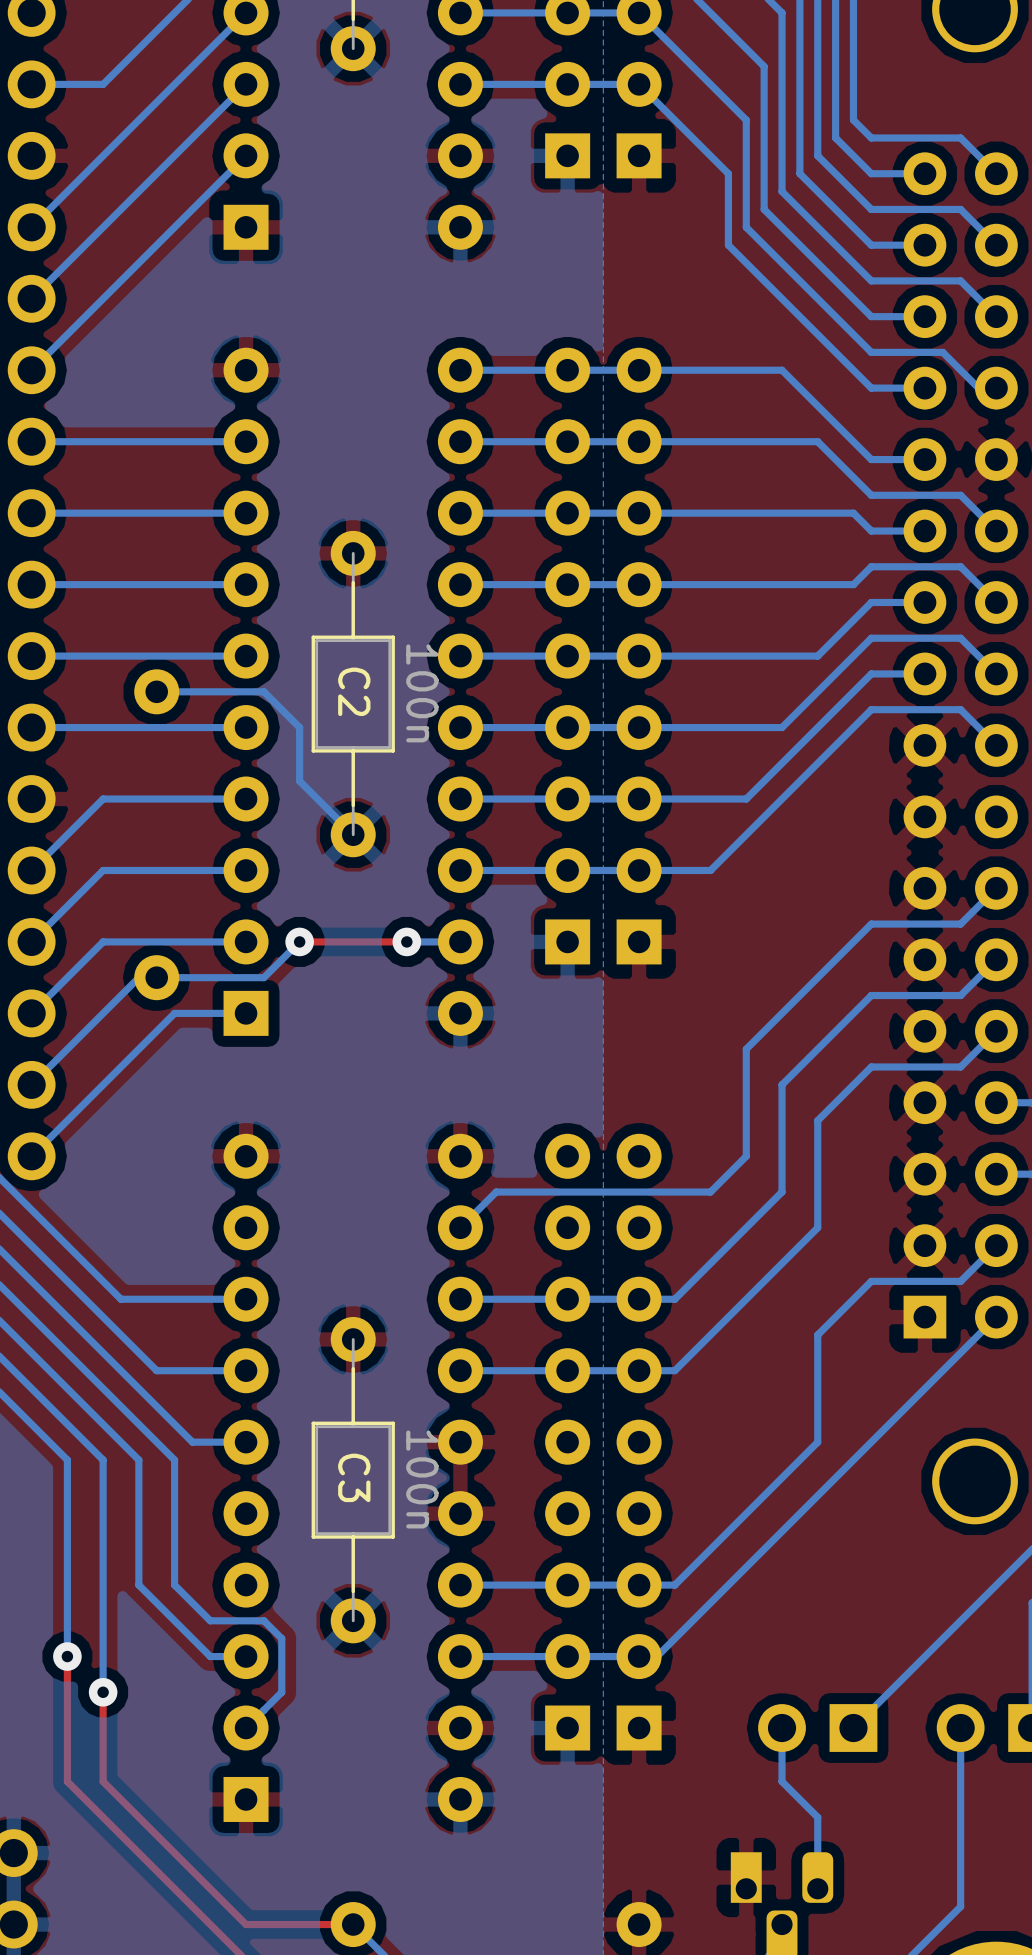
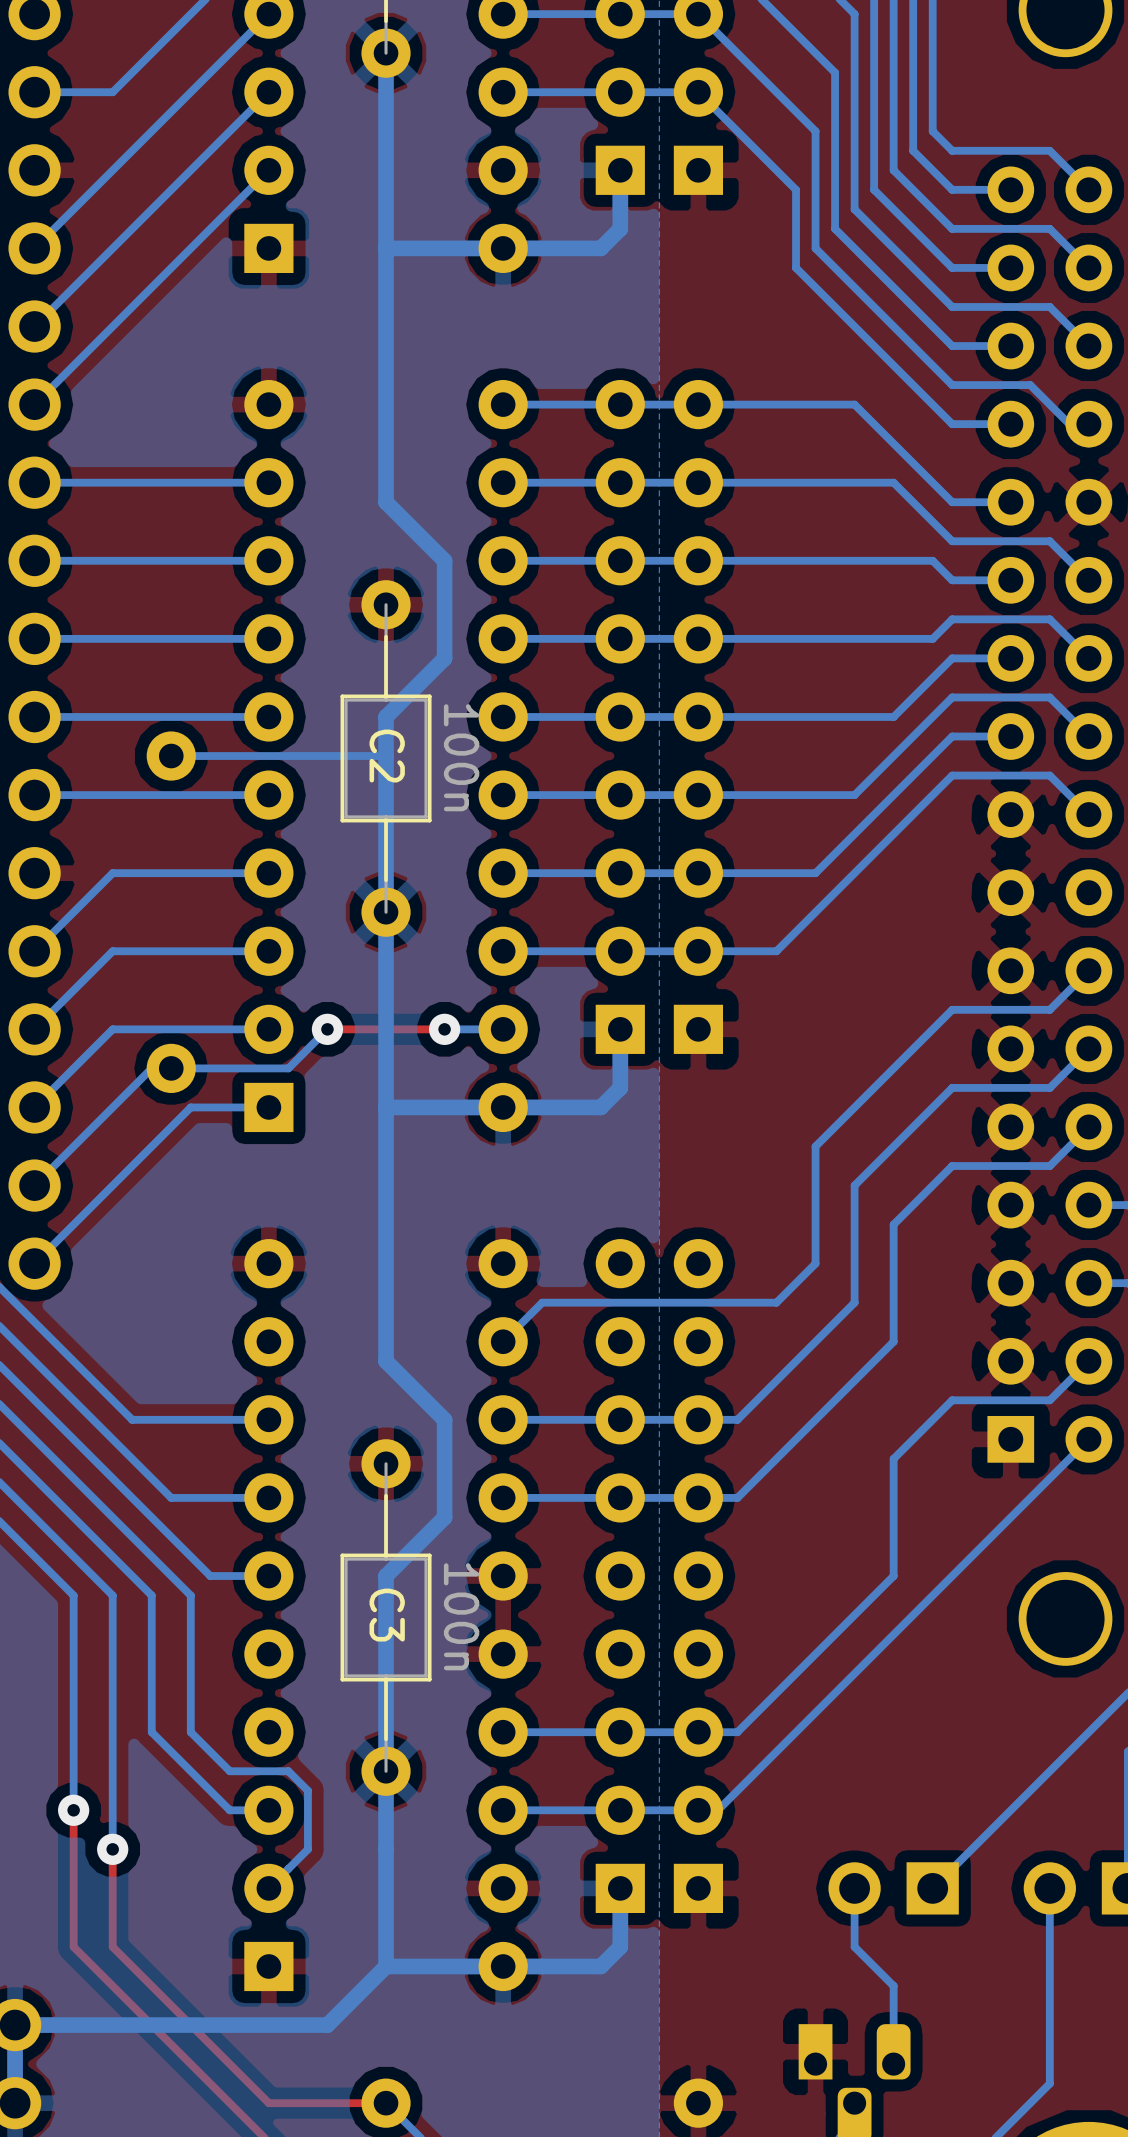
bottom track: none -> (386, 53) (386, 502) (444, 560) (444, 658) (386, 716) (386, 1361) (444, 1419) (444, 1517) (386, 1576) (386, 1966)
bottom track: none -> (620, 170) (620, 228) (600, 248) (386, 248)
bottom track: (263, 691) (299, 727) (299, 781) (353, 834) -> (288, 756) (386, 756)
bottom track: none -> (620, 1029) (620, 1087) (600, 1107) (386, 1107)
bottom track: none -> (620, 1888) (620, 1946) (600, 1966) (386, 1966)
bottom track: none -> (386, 1966) (327, 2025) (15, 2025) (15, 2103)

